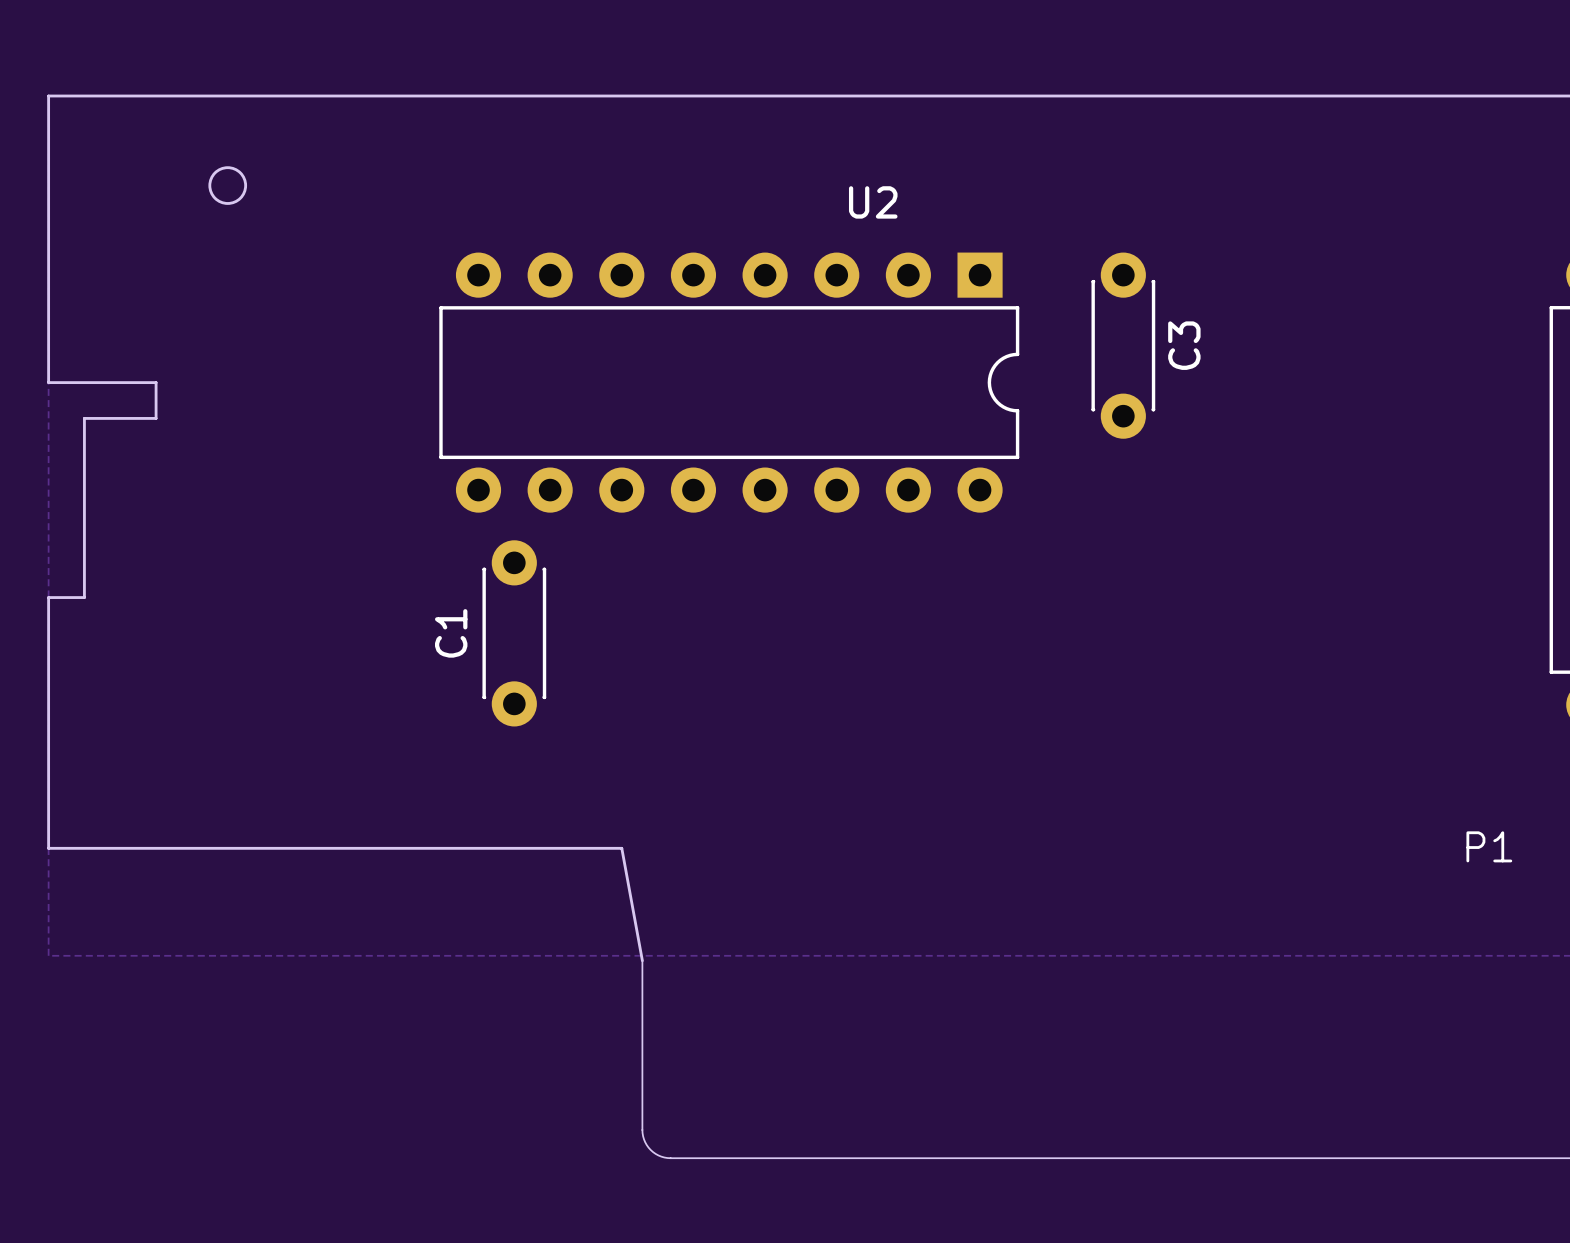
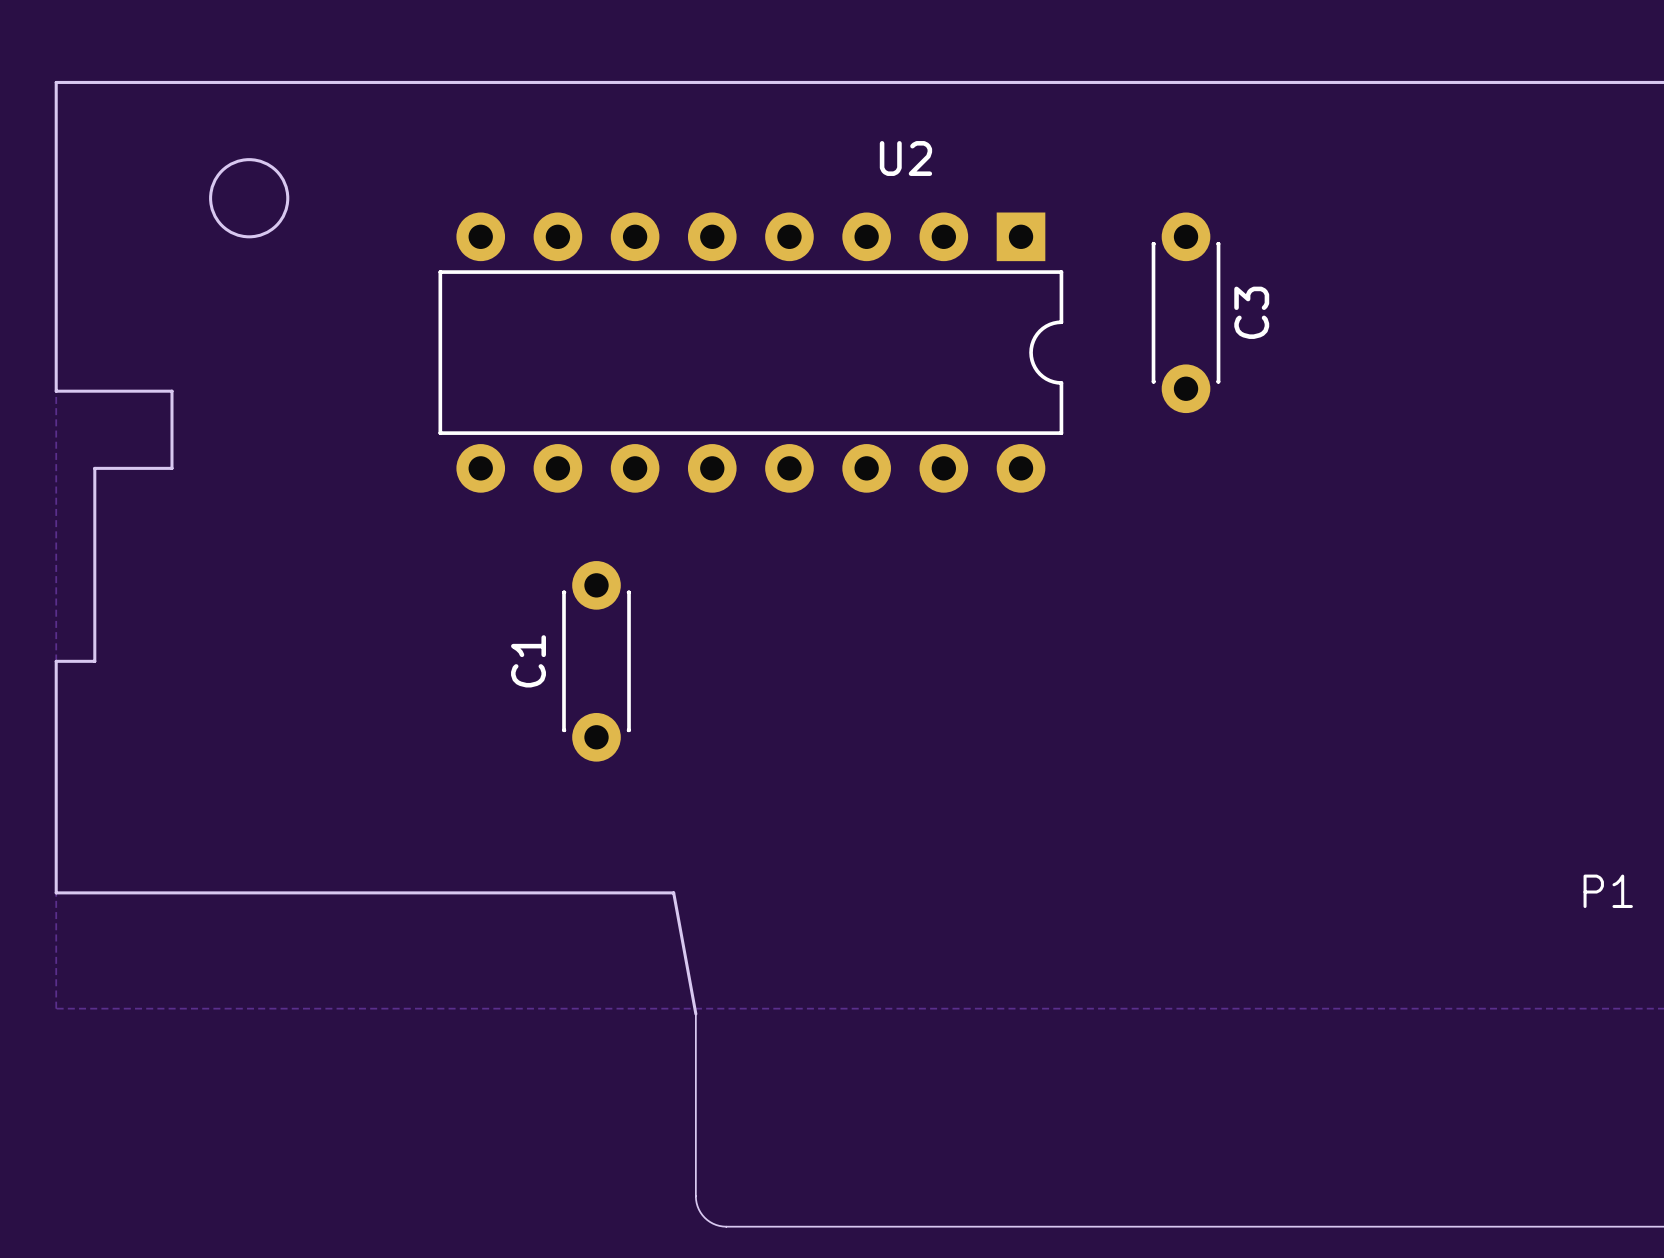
round board edge size: [208, 166, 248, 205] -> [209, 158, 290, 239]
C3 position: (1123, 345) -> (1186, 312)
U2 position: (729, 382) -> (750, 352)
board edge: (156, 418) (84, 418) (84, 454) -> (171, 429) (171, 468) (94, 468)
board edge: (84, 597) (48, 597) (48, 633) -> (94, 622) (94, 661) (56, 661)
C1 position: (514, 633) -> (596, 661)

